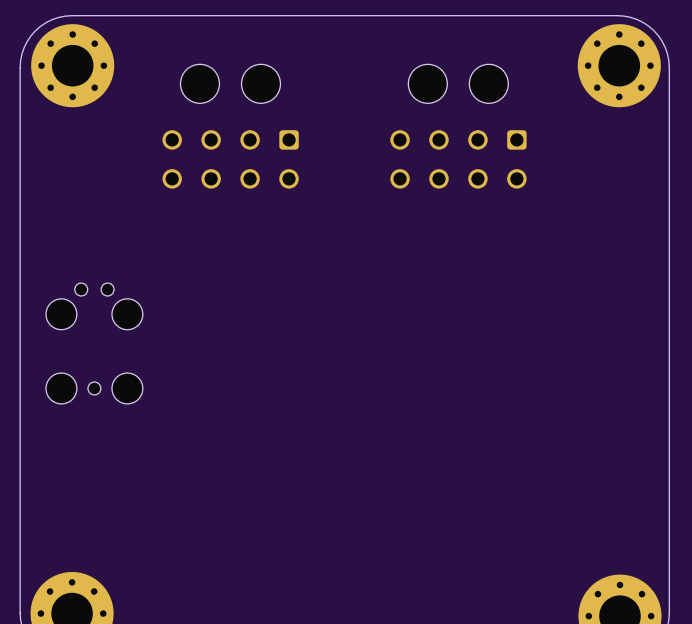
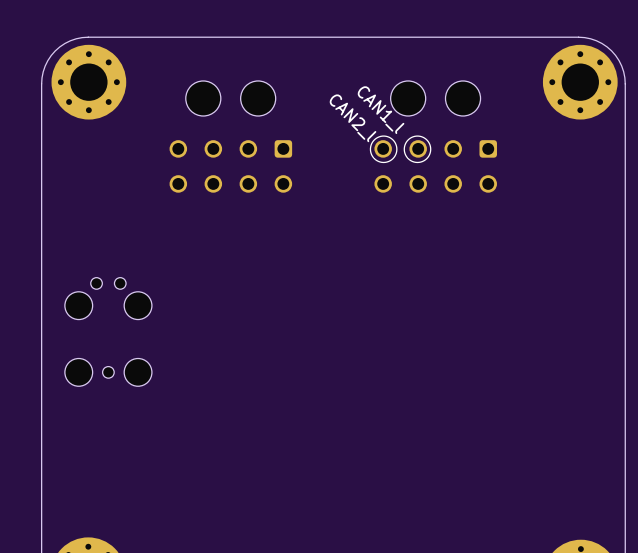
text: none -> CAN1_l (381, 110)
text: none -> CAN2_l (353, 118)
line: none -> (373, 157) (370, 148) (374, 139) (384, 136) (393, 140) (396, 149) (392, 158) (383, 162) (374, 158)
line: none -> (407, 157) (404, 148) (408, 139) (418, 136) (427, 140) (430, 149) (426, 158) (417, 162) (408, 158)

